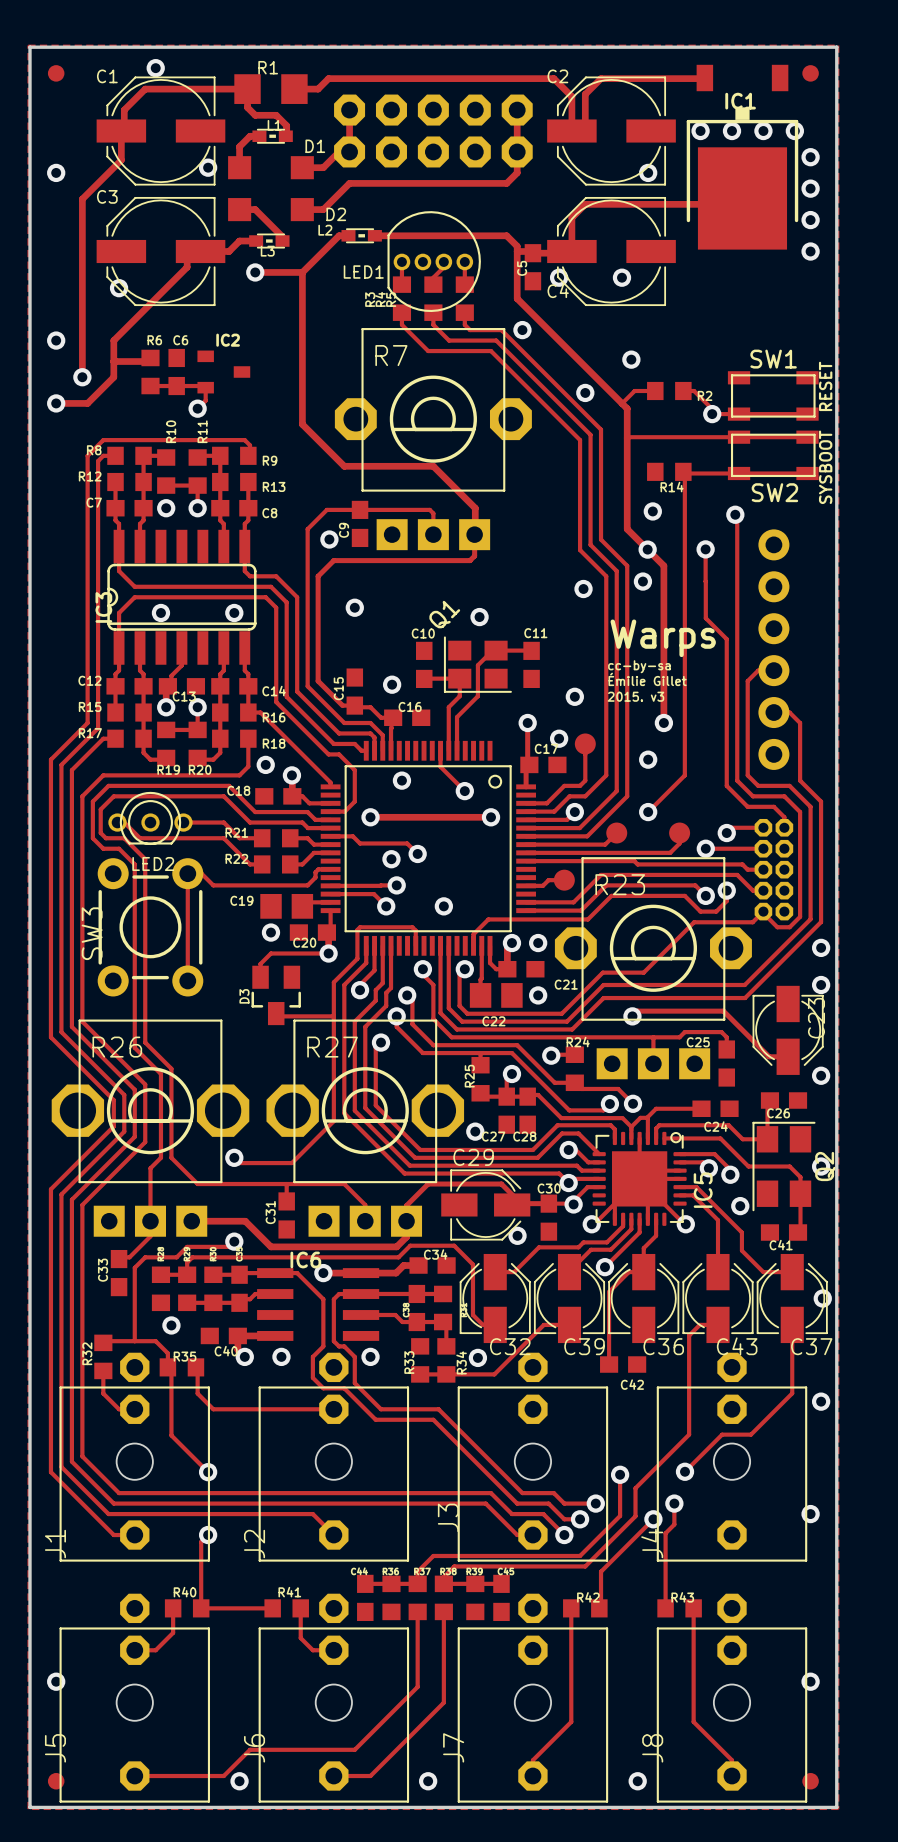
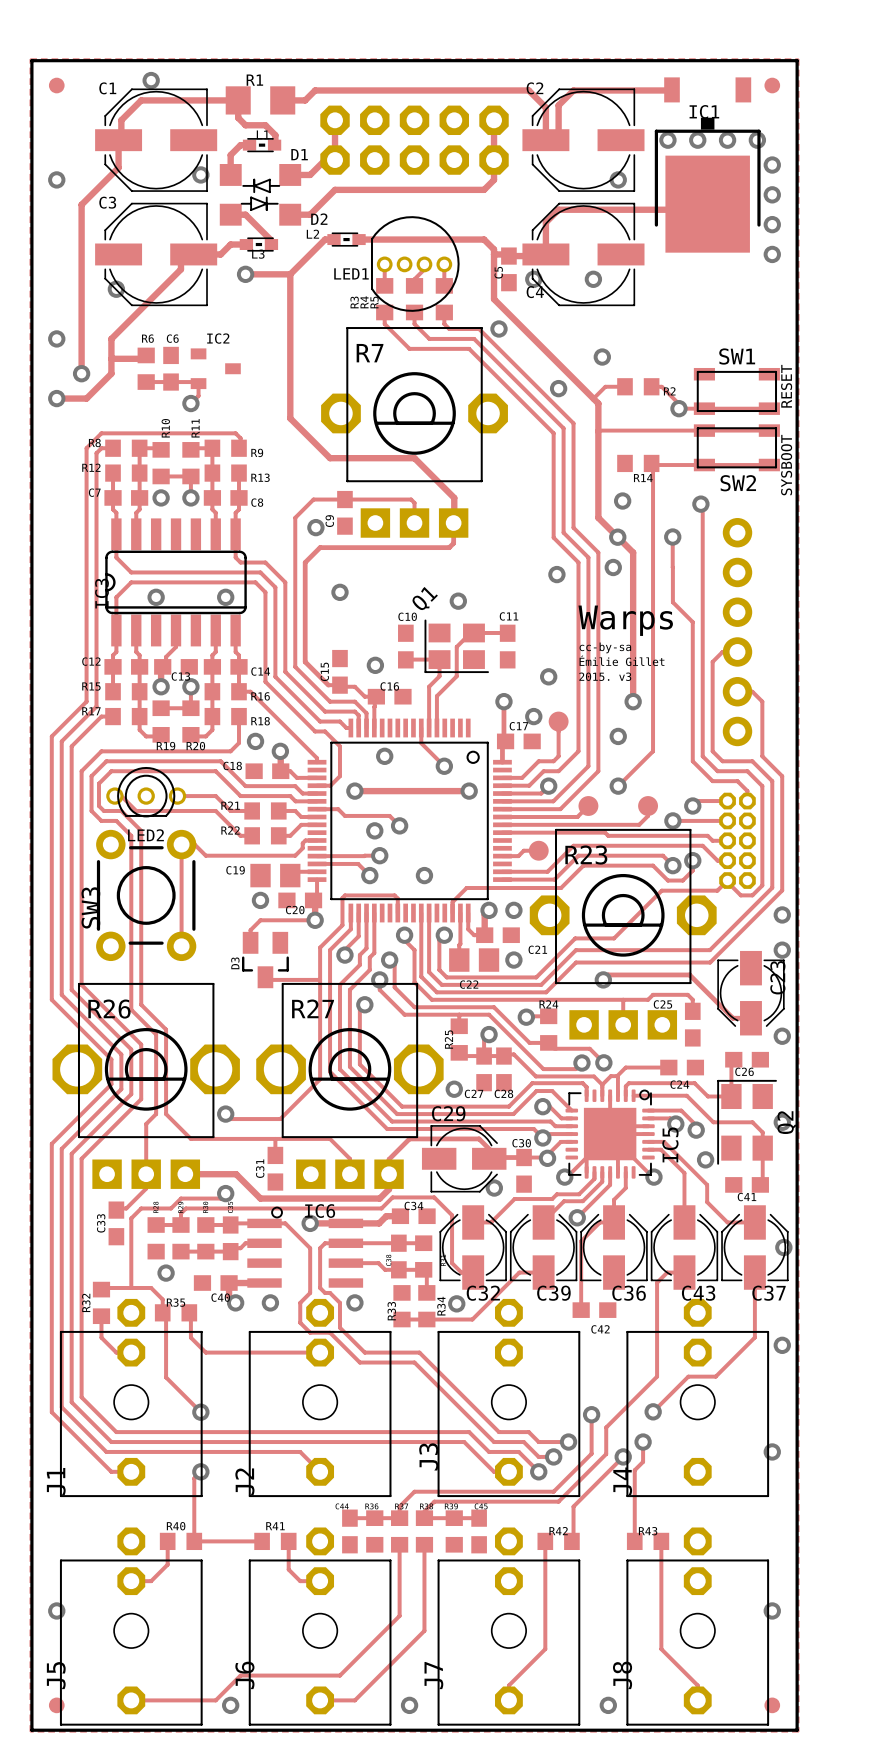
D1 footprint: [228, 156, 314, 180] -> [219, 164, 302, 194]
D2 footprint: [228, 198, 314, 222] -> [219, 196, 302, 226]
IC6 footprint: [257, 1268, 380, 1341] -> [247, 1206, 364, 1288]

